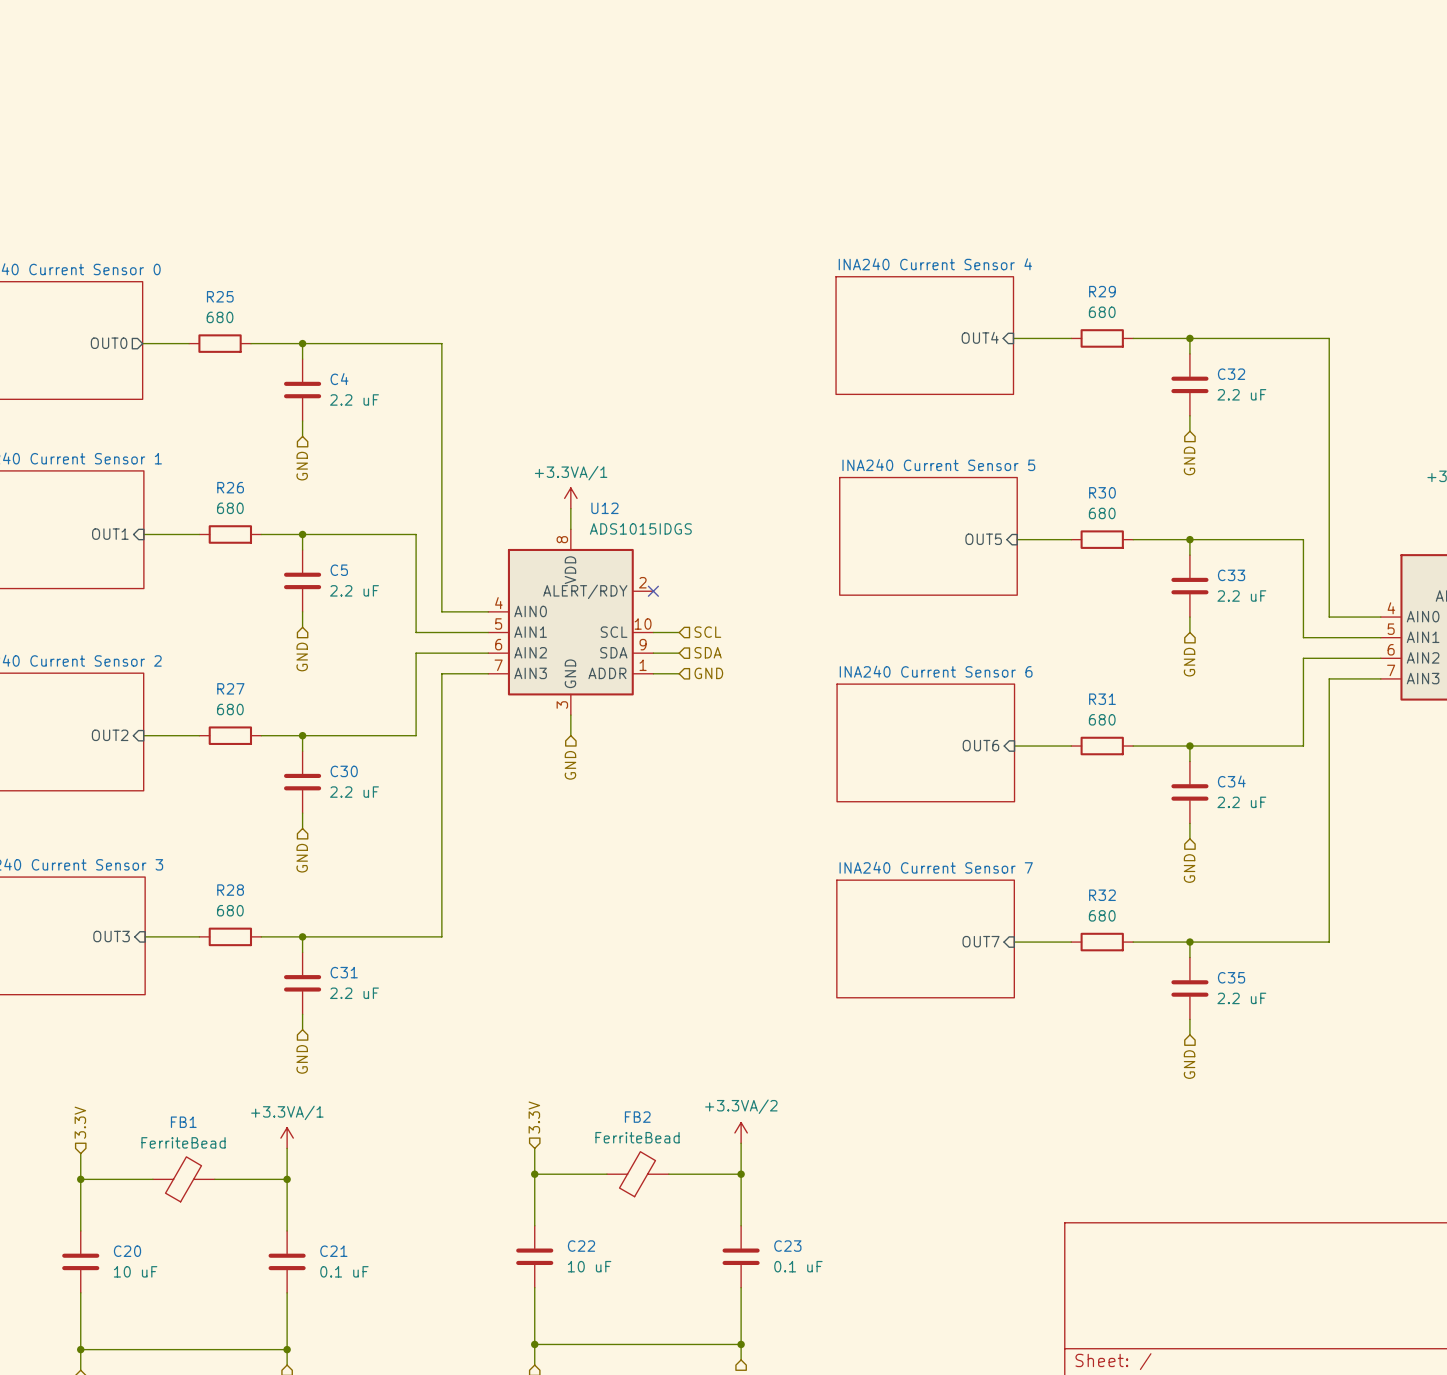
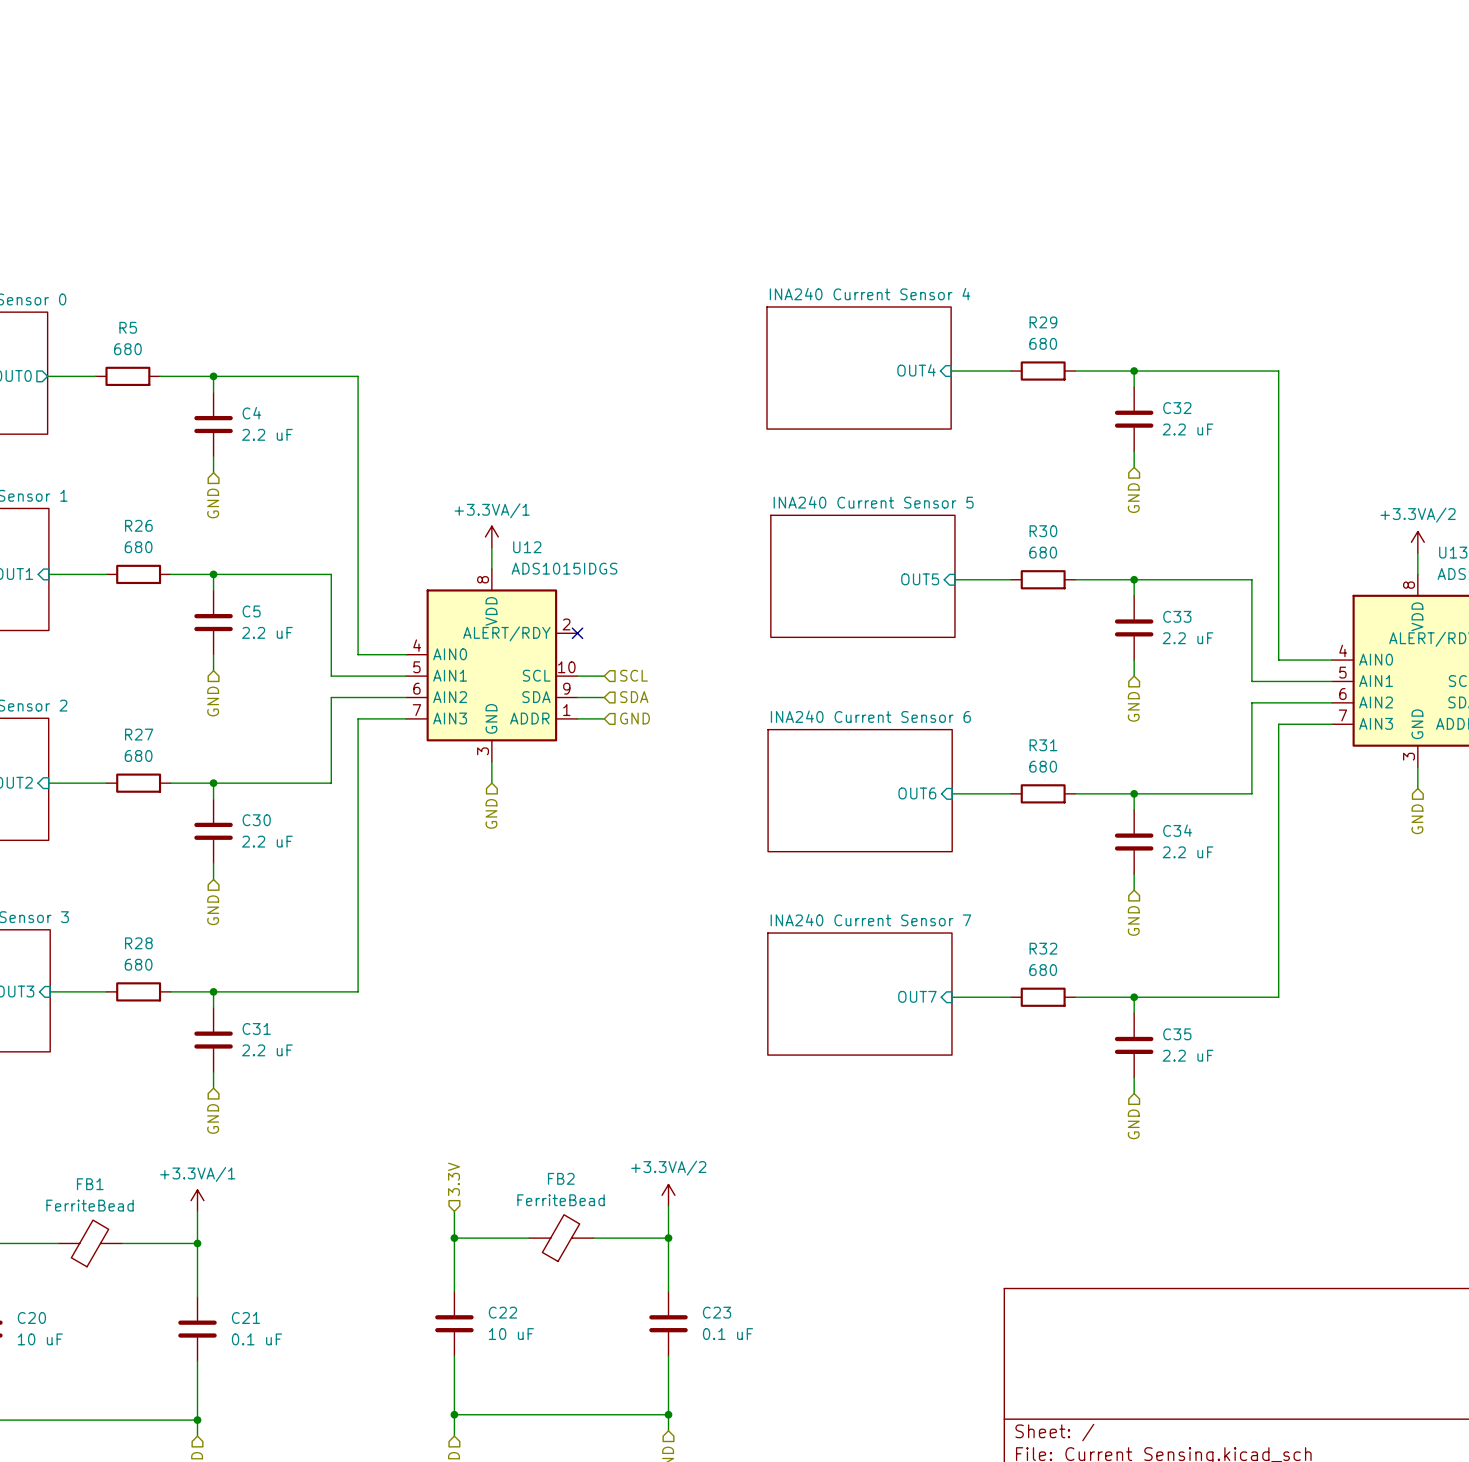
R25 name: R25 (220, 296) -> R5 (128, 327)

